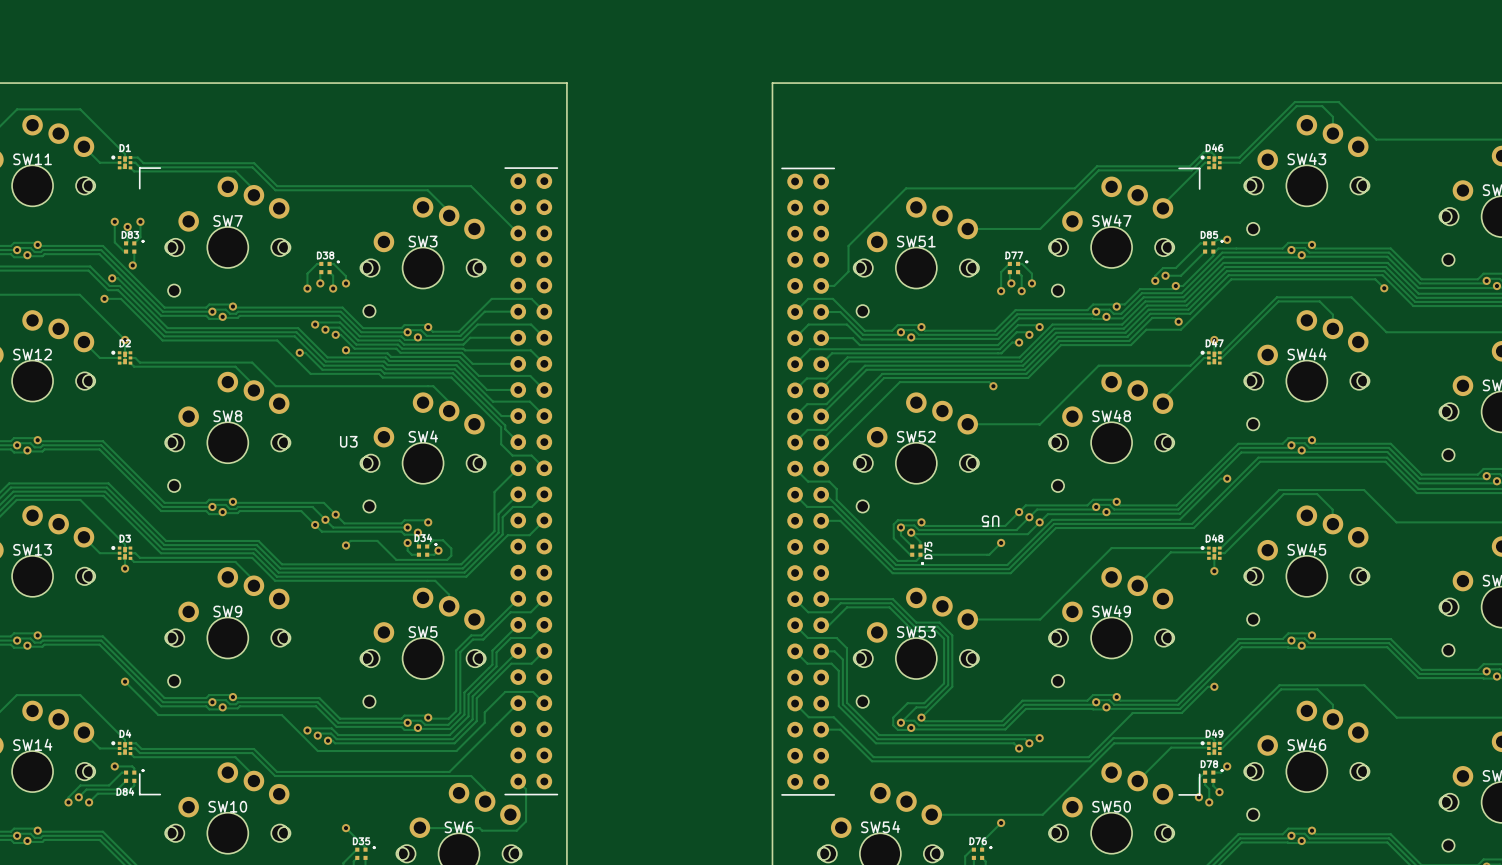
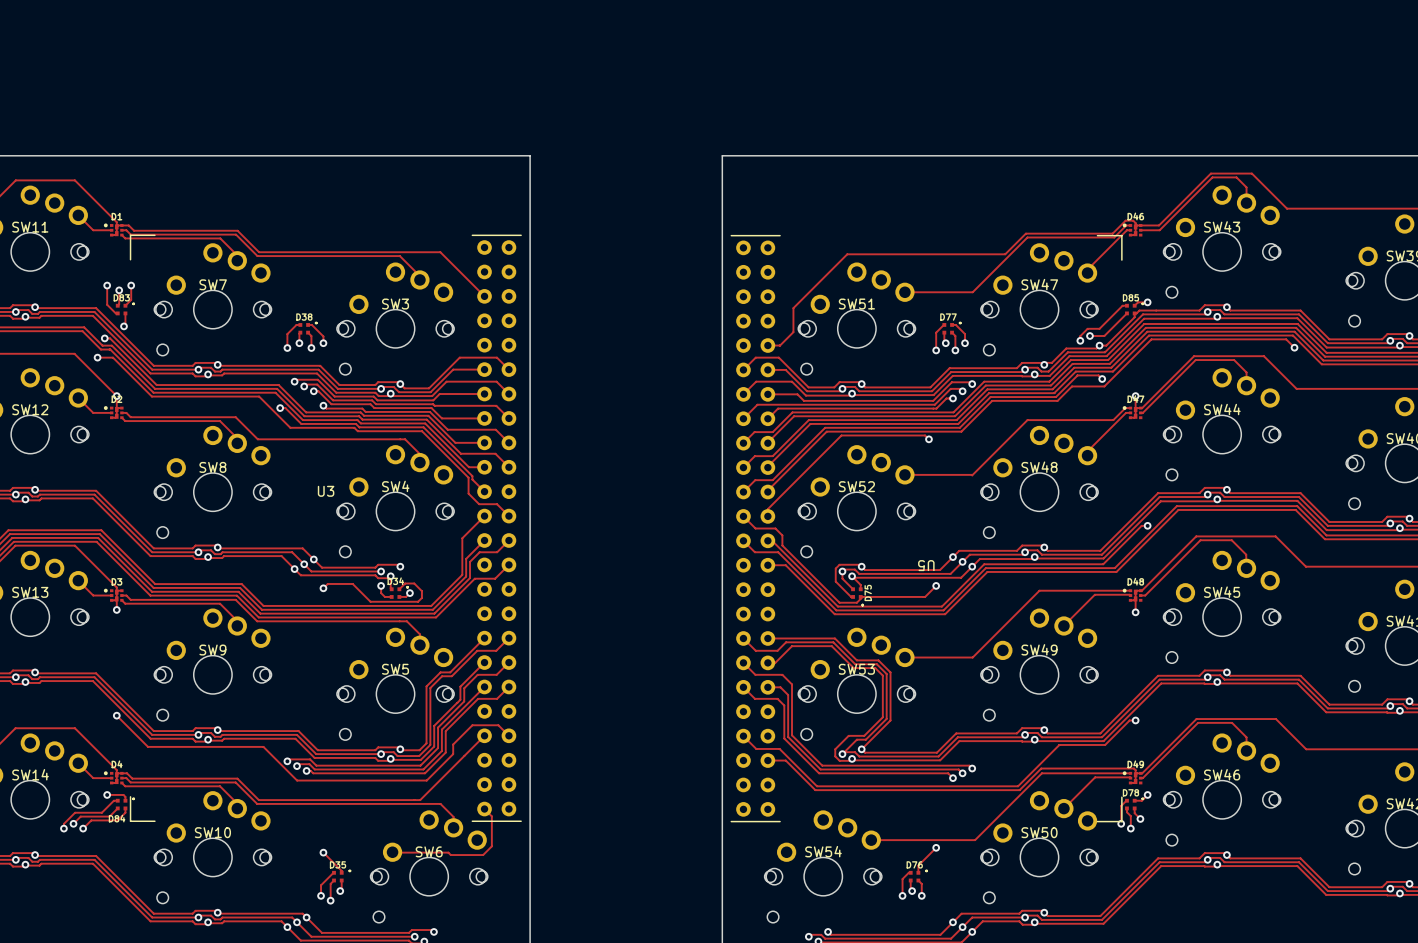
U3 footprint: [139, 167, 559, 796] -> [129, 234, 522, 822]
U5 footprint: [781, 167, 1201, 796] -> [730, 235, 1123, 823]

